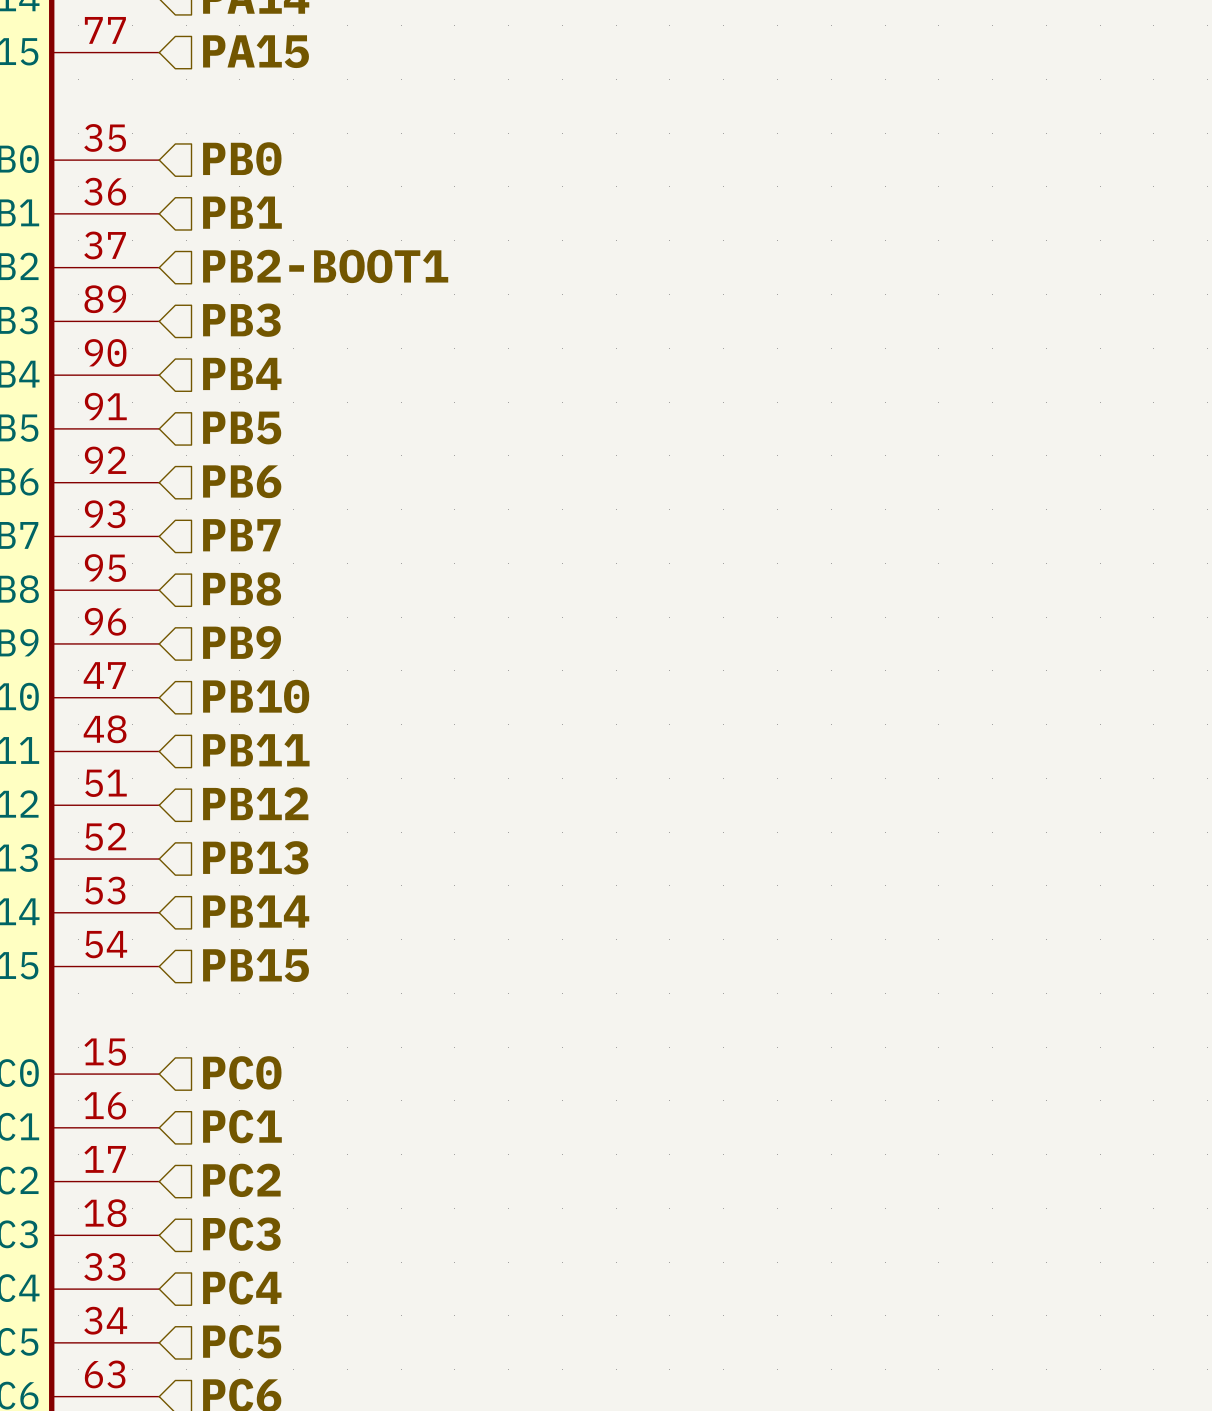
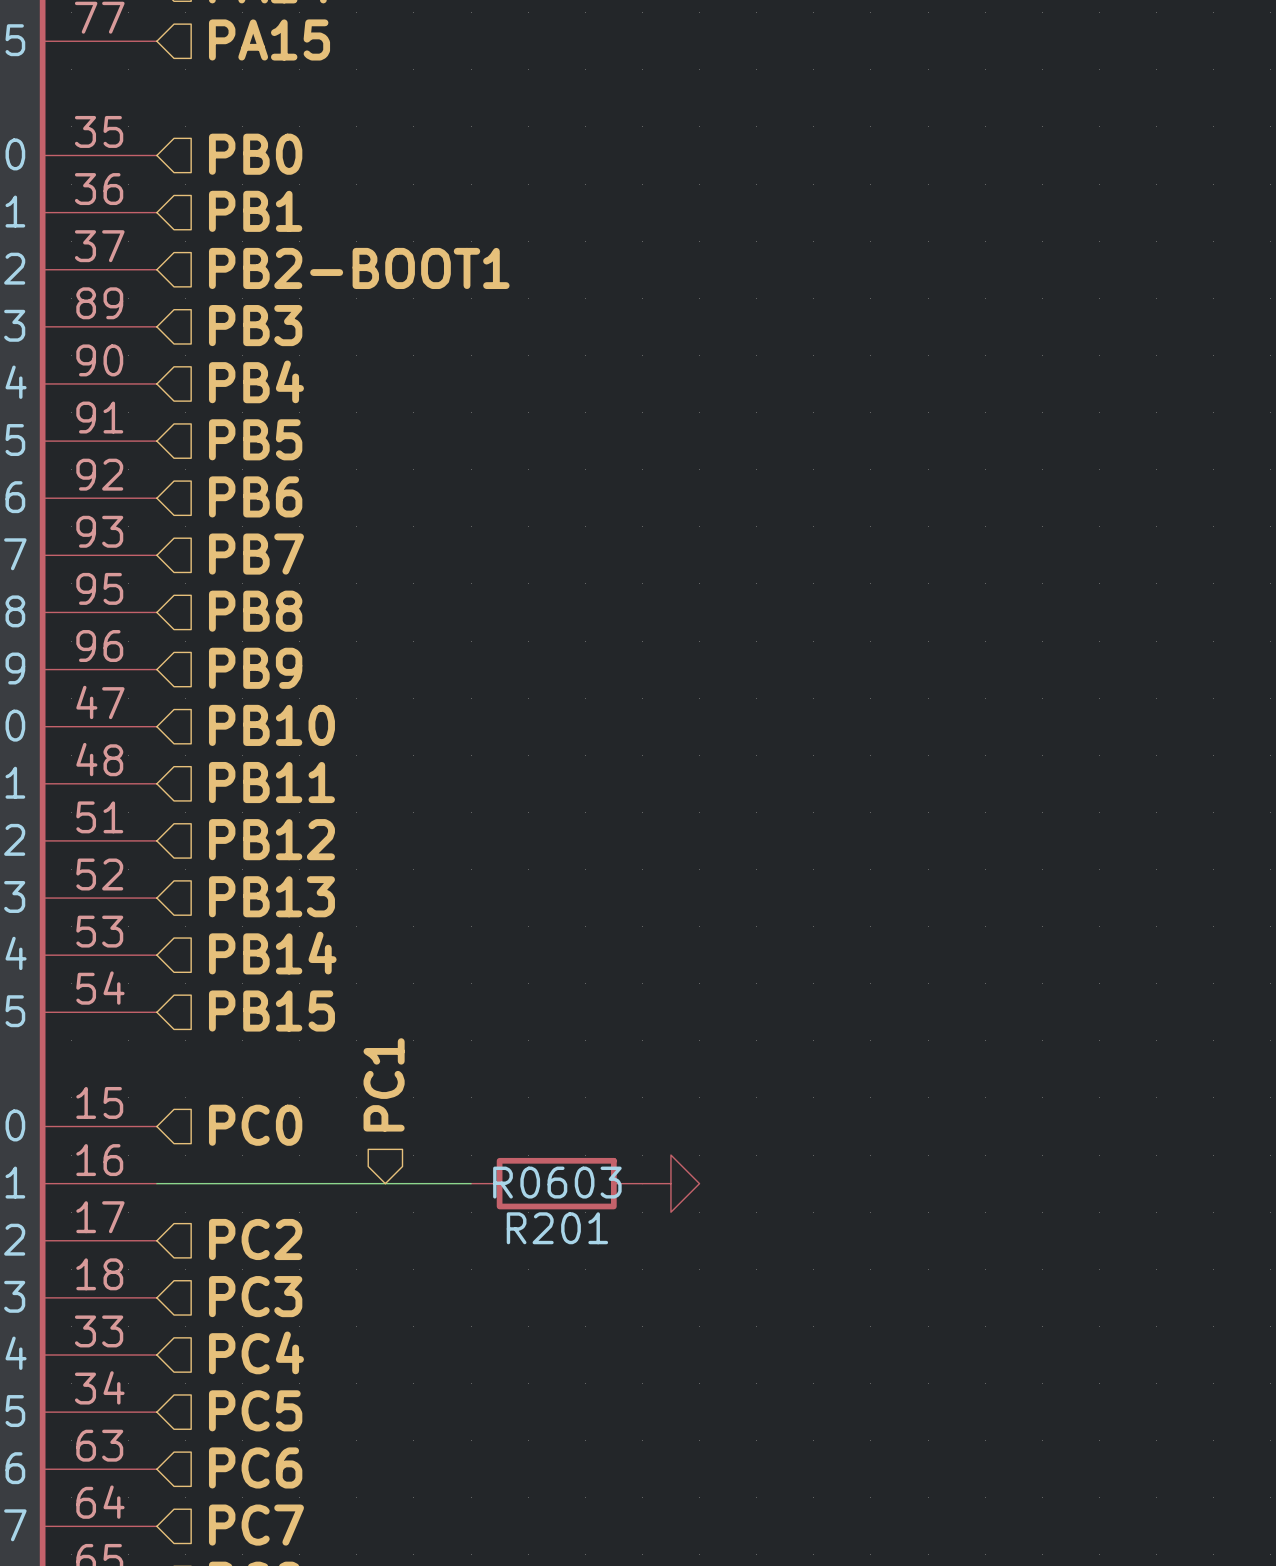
hierarchical label rotation: 0° (242, 1126) -> 90° counterclockwise (384, 1084)
hierarchical label position: PC1 (242, 1126) -> PC1 (384, 1084)
wire: none -> (156, 1183) (471, 1183)
R201: none -> R0603 (556, 1183)
power symbol: none -> (670, 1183)

